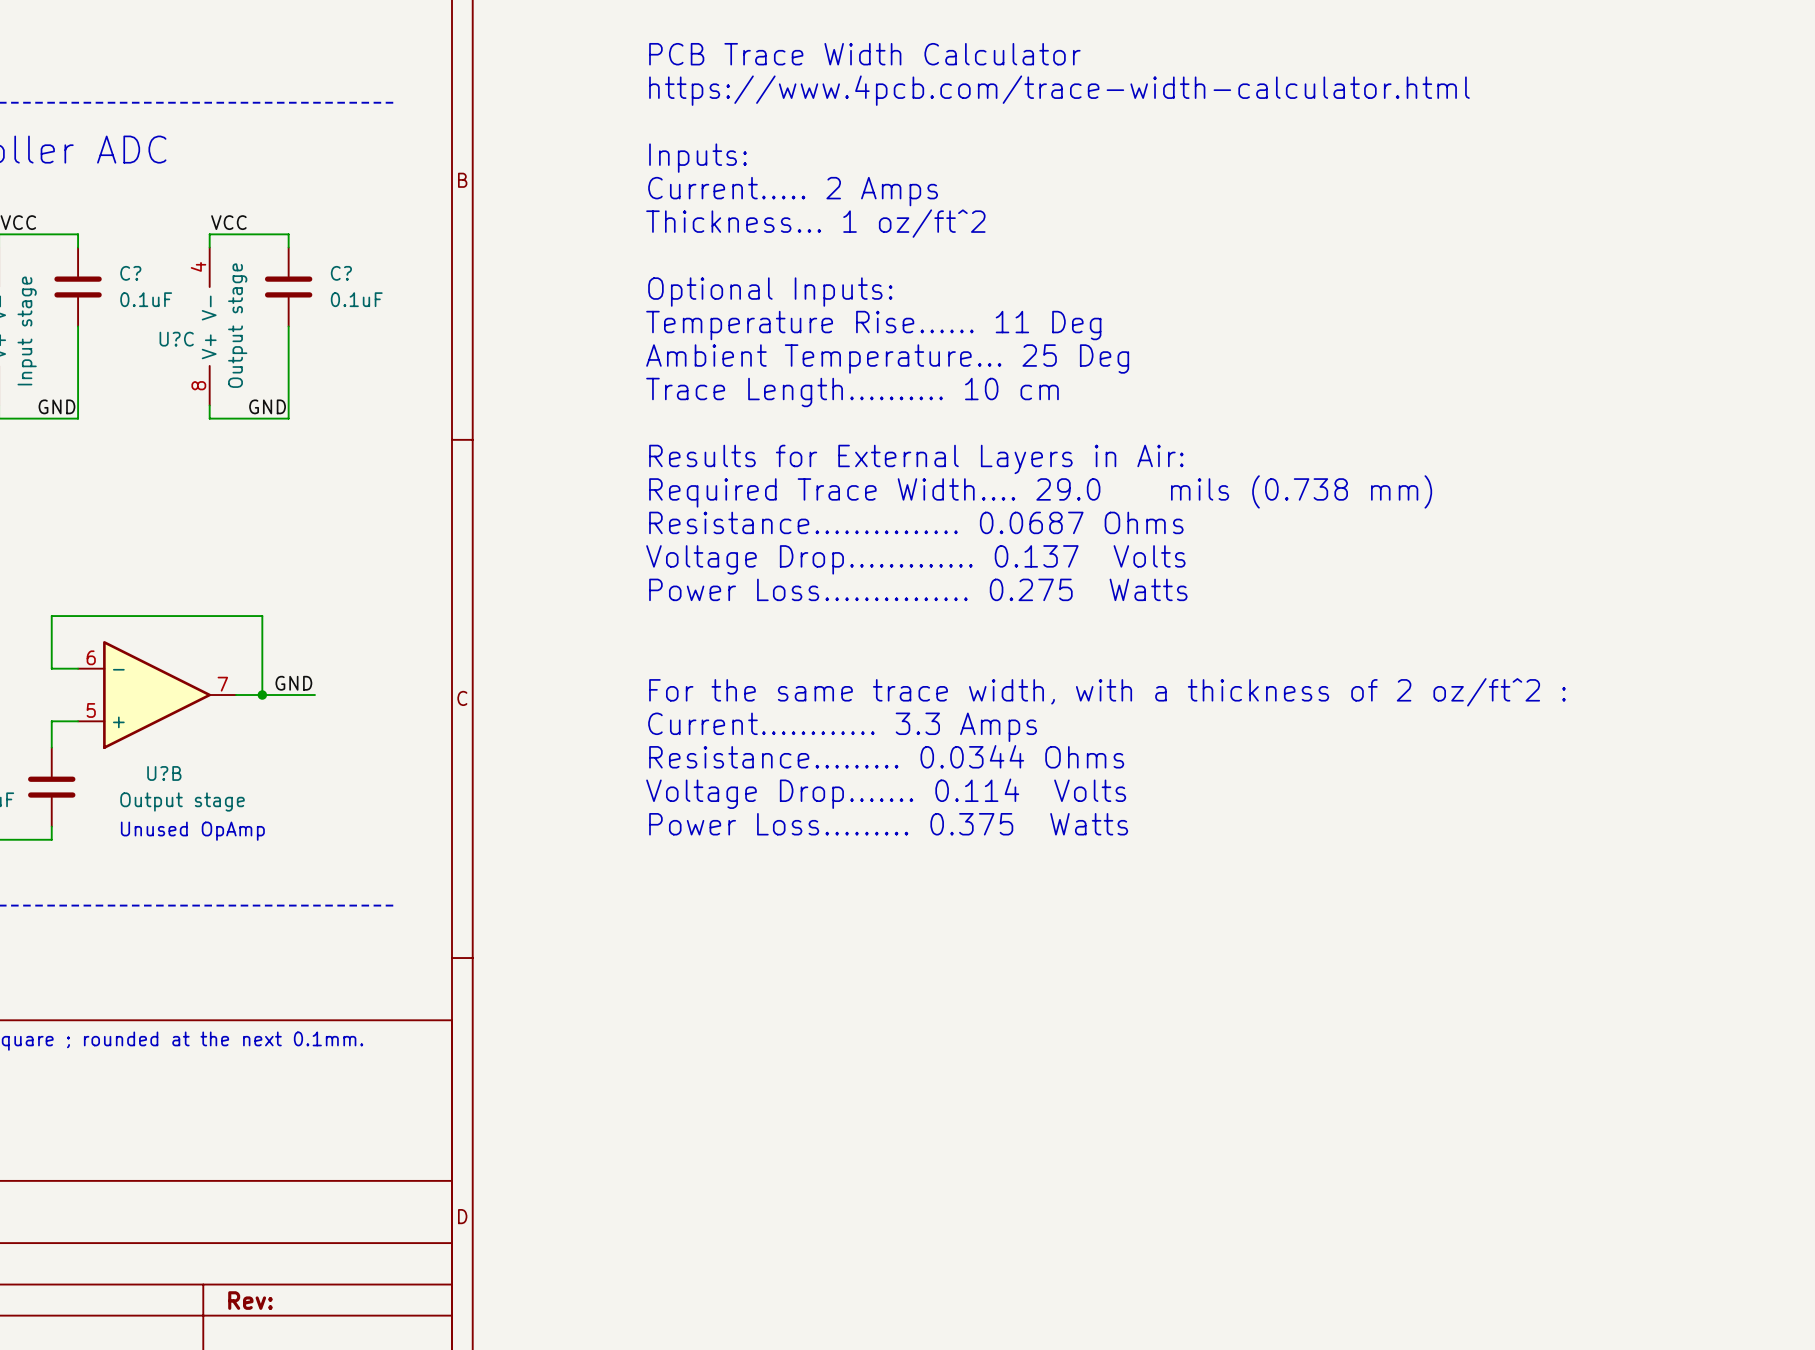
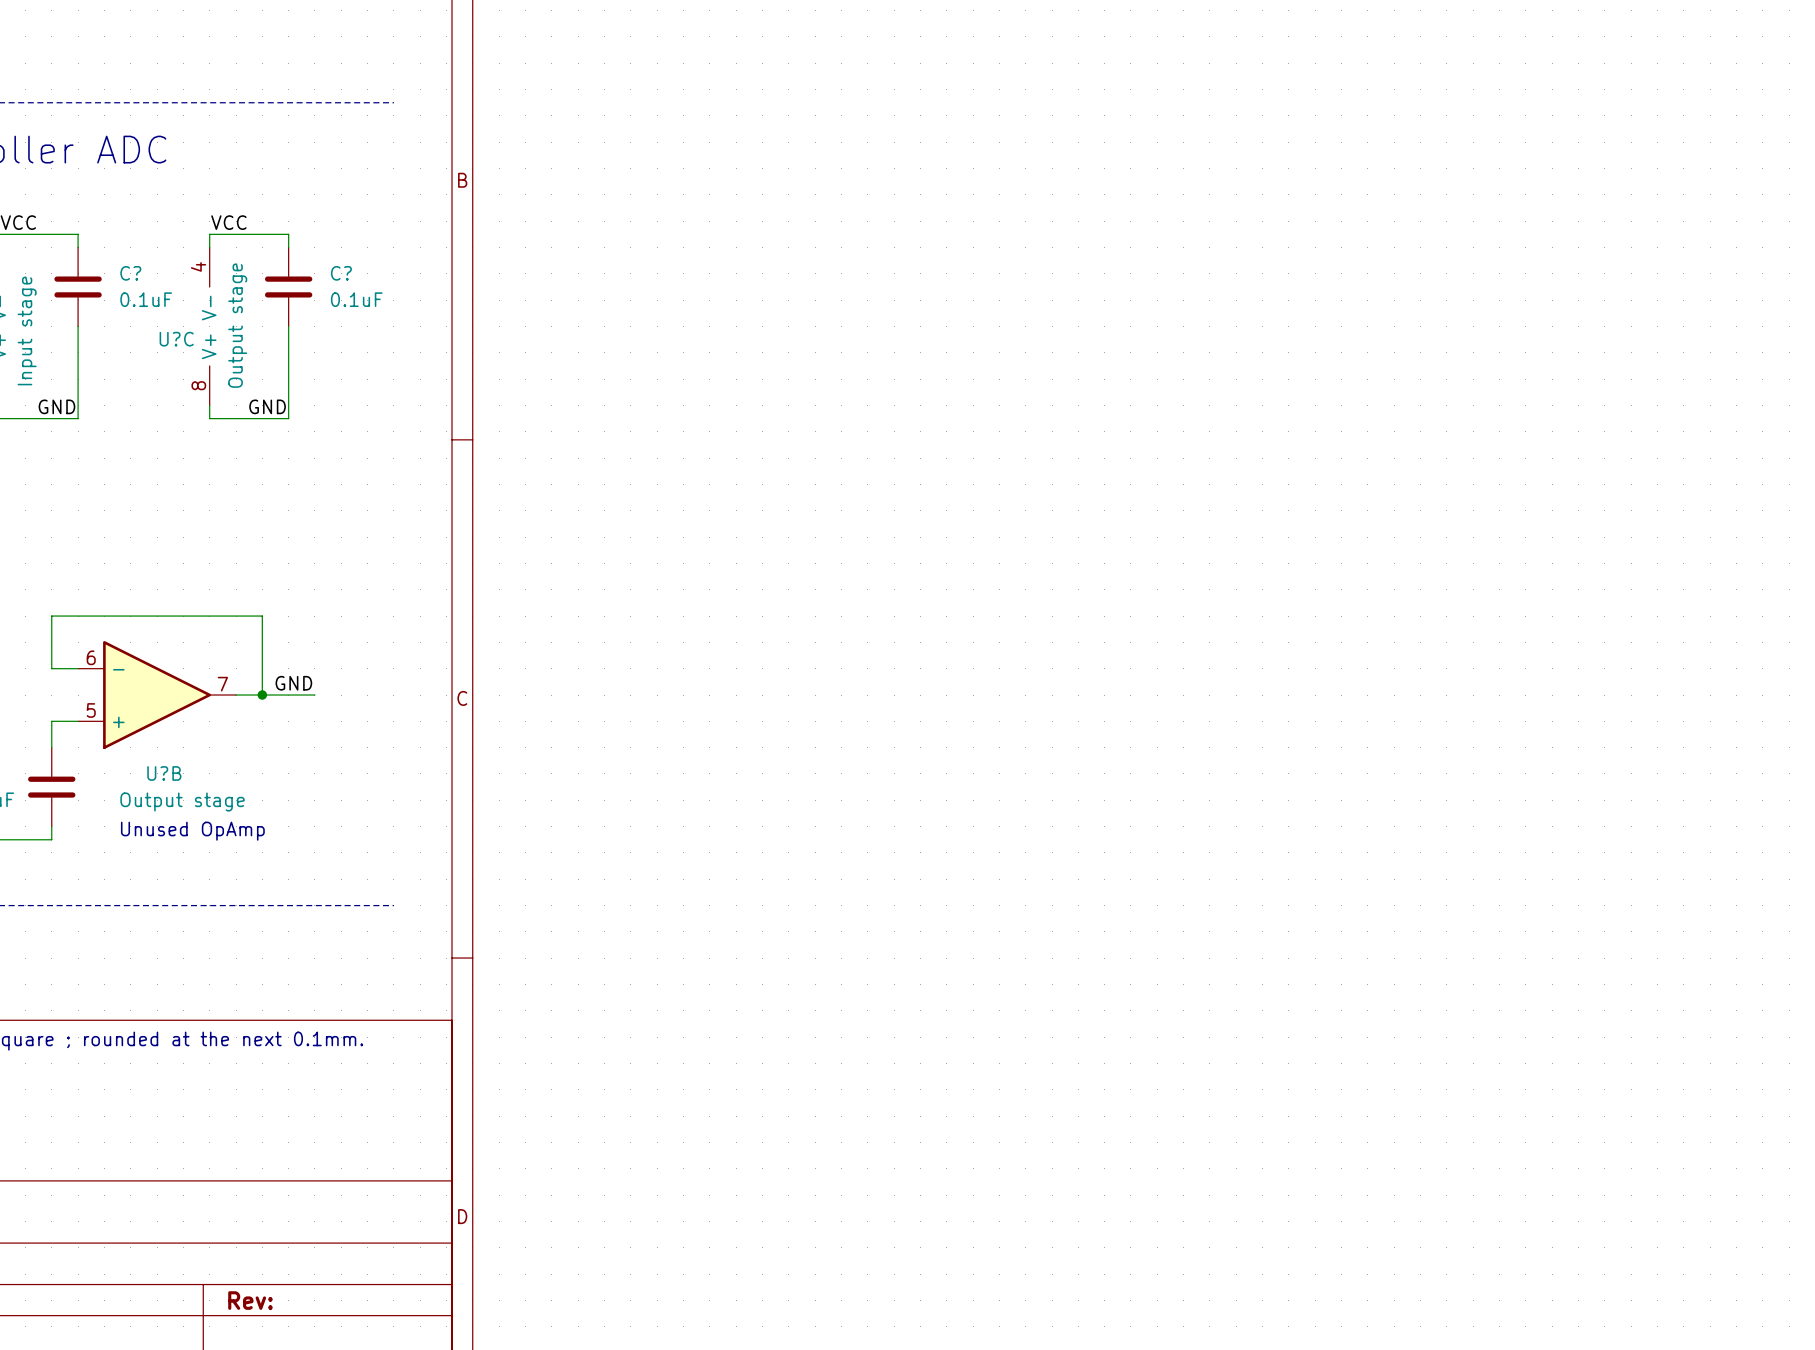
text: PCB Trace Width Calculator (864, 54) -> none
text: https://www.4pcb.com/trace-width-calculator.html (1059, 90) -> none
text: Inputs: (698, 158) -> none
text: Current..... 2 Amps (793, 191) -> none
text: Thickness... 1 oz/ft^2 (815, 223) -> none
text: Optional Inputs: (770, 292) -> none
text: Temperature Rise...... 11 Deg (873, 325) -> none
text: Ambient Temperature... 25 Deg (887, 358) -> none
text: Trace Length.......... 10 cm (852, 392) -> none
text: Results for External Layers in Air: (916, 459) -> none
text: Required Trace Width.... 29.0 mils (0.738 mm) (1040, 491) -> none
text: Resistance............... 0.0687 Ohms (916, 522) -> none
text: Voltage Drop............. 0.137 Volts (915, 559) -> none
text: Power Loss............... 0.275 Watts (918, 589) -> none
text: For the same trace width, with a thickness of 2 oz/ft^2 : (1107, 692) -> none
text: Current............ 3.3 Amps (842, 727) -> none
text: Resistance......... 0.0344 Ohms (886, 756) -> none
text: Voltage Drop....... 0.114 Volts (886, 793) -> none
text: Power Loss......... 0.375 Watts (888, 824) -> none

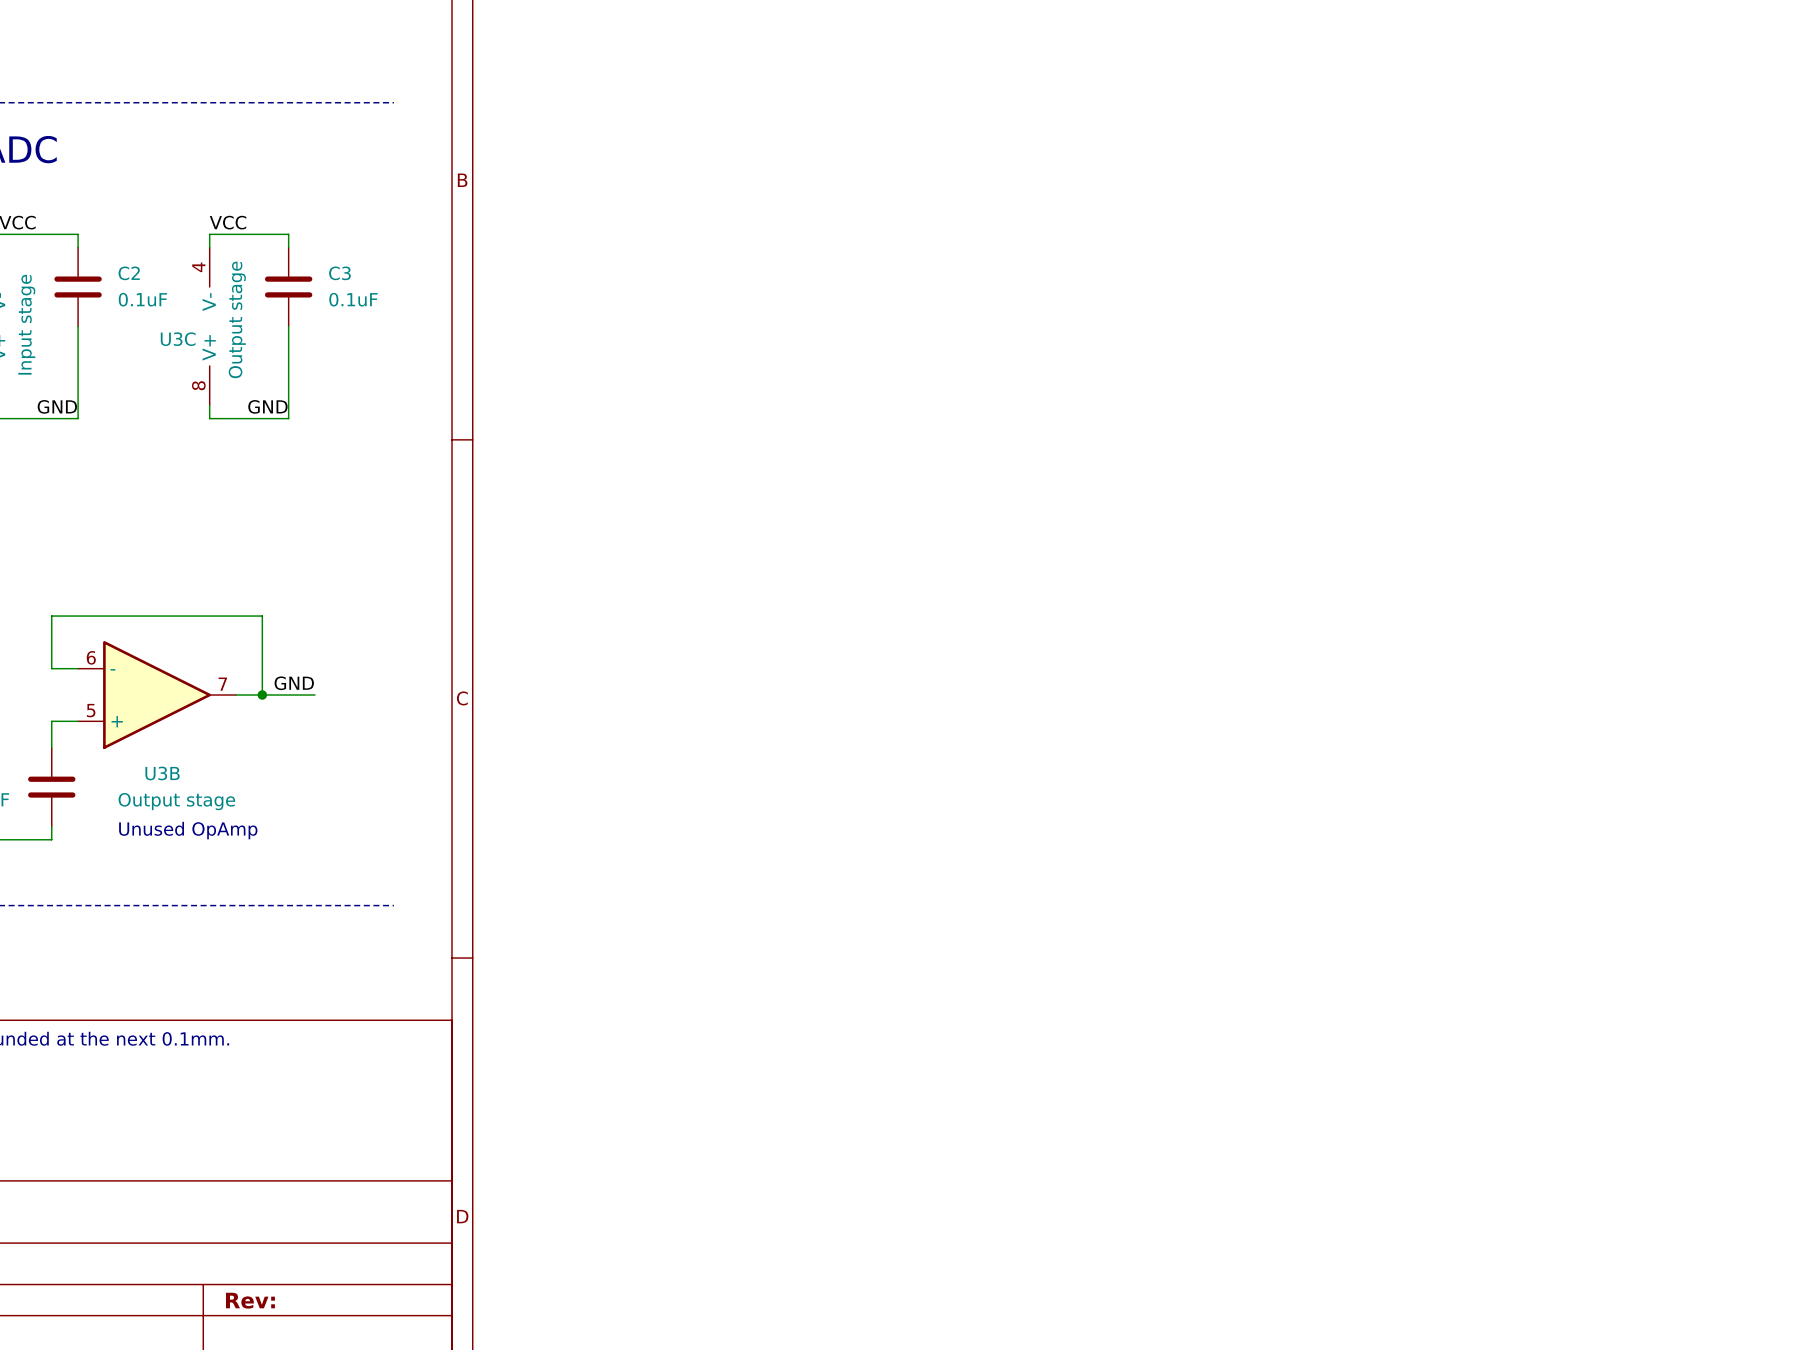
C? name: C? (130, 273) -> C2 (129, 273)
C? name: C? (341, 273) -> C3 (339, 273)
U?C name: U?C (176, 339) -> U3C (178, 339)
U?B name: U?B (164, 773) -> U3B (162, 773)

